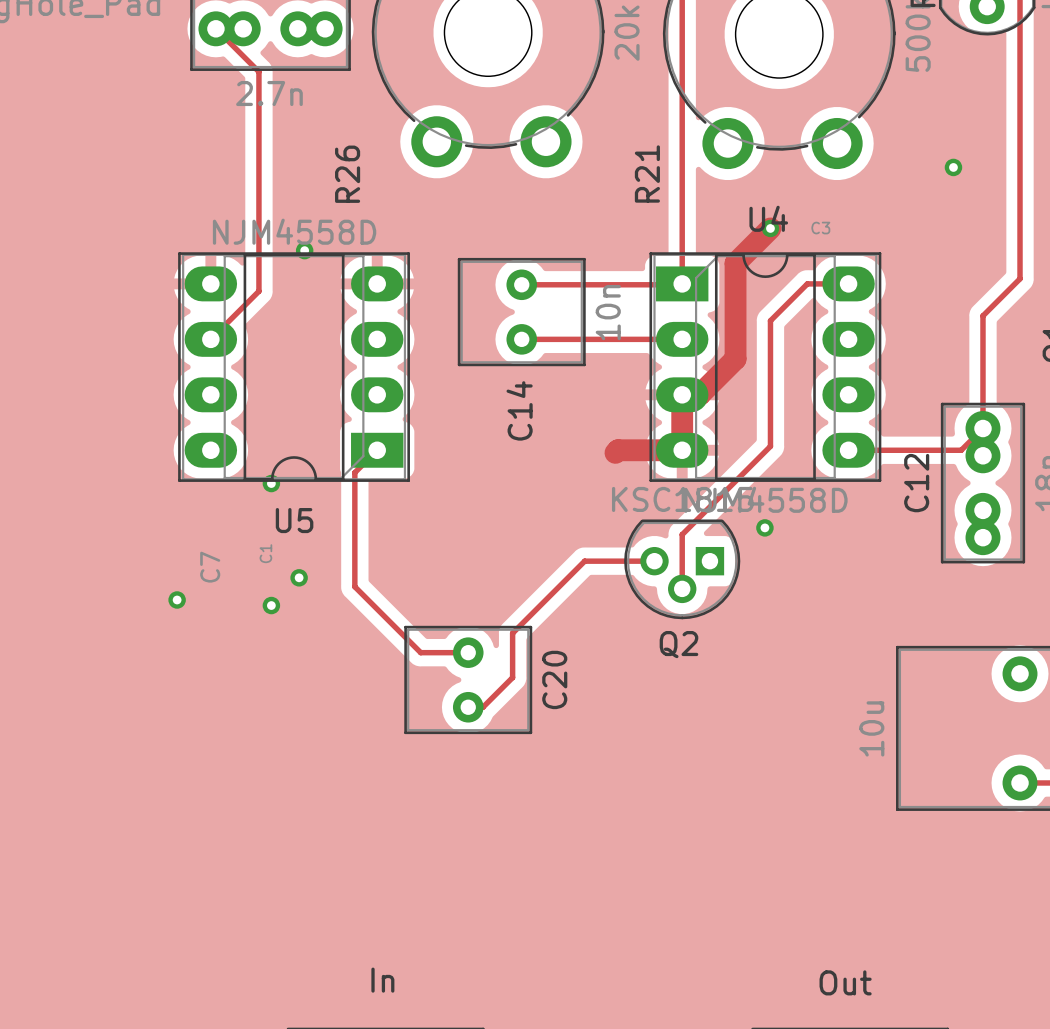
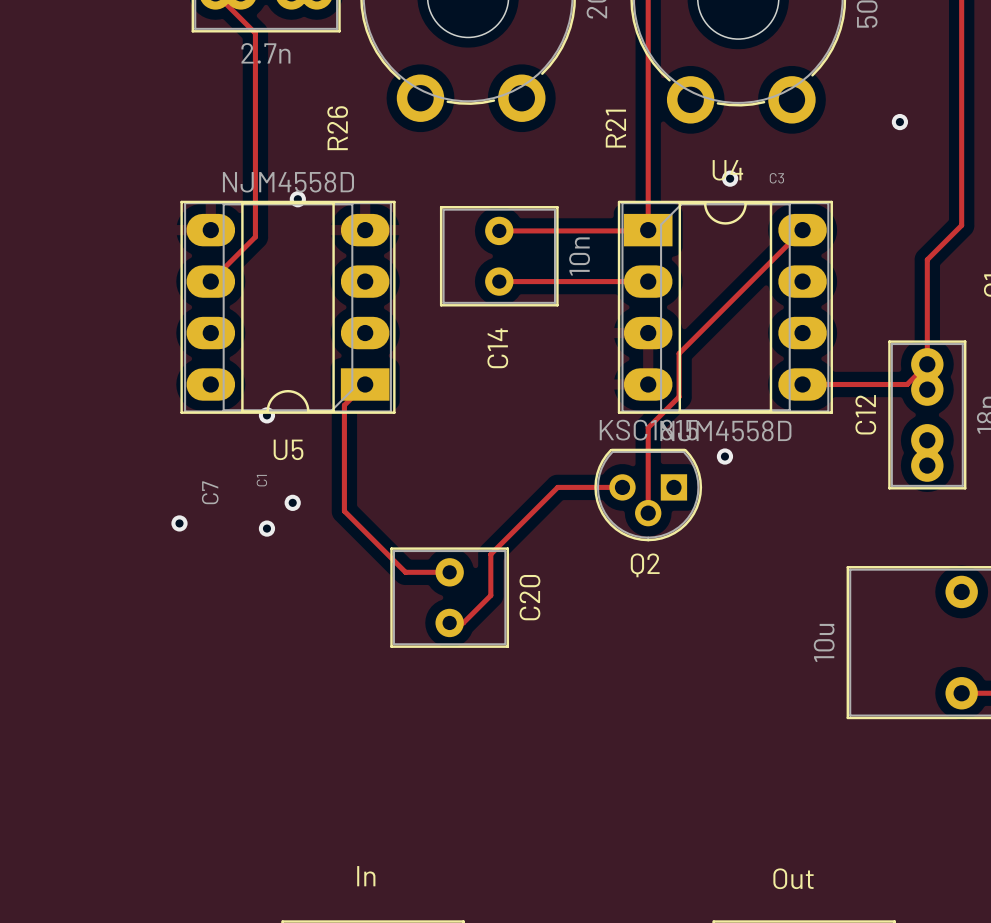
track: (770, 228) (735, 263) (735, 359) (699, 394) (682, 394) (682, 450) (618, 450) (615, 452) -> none
track: (848, 283) (807, 283) (770, 320) (770, 446) (682, 534) -> (802, 230) (679, 353) (679, 396) (648, 427) (648, 462)

